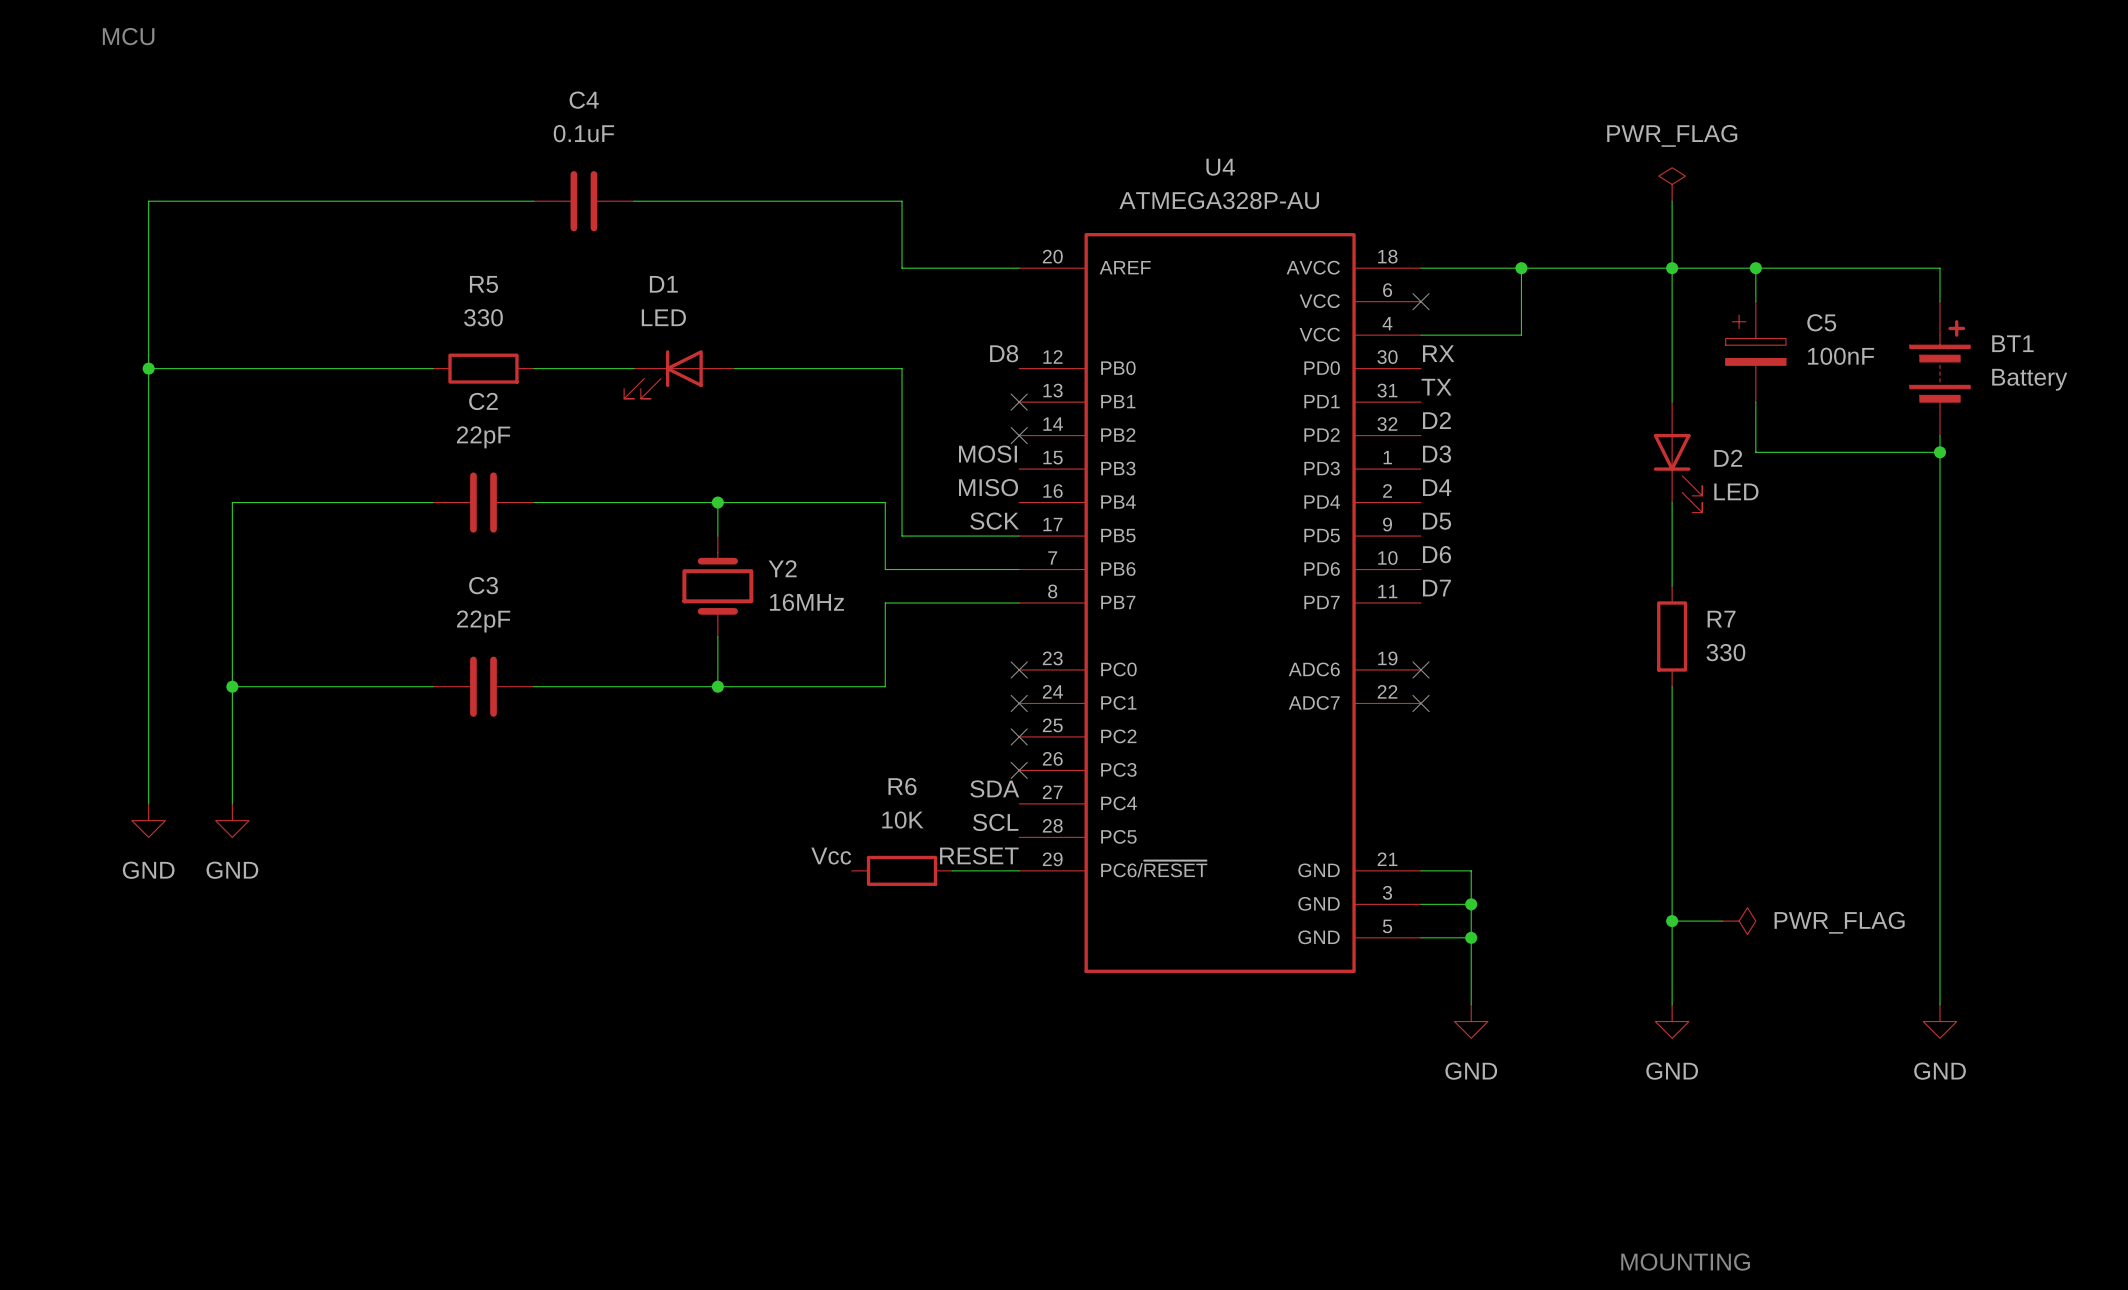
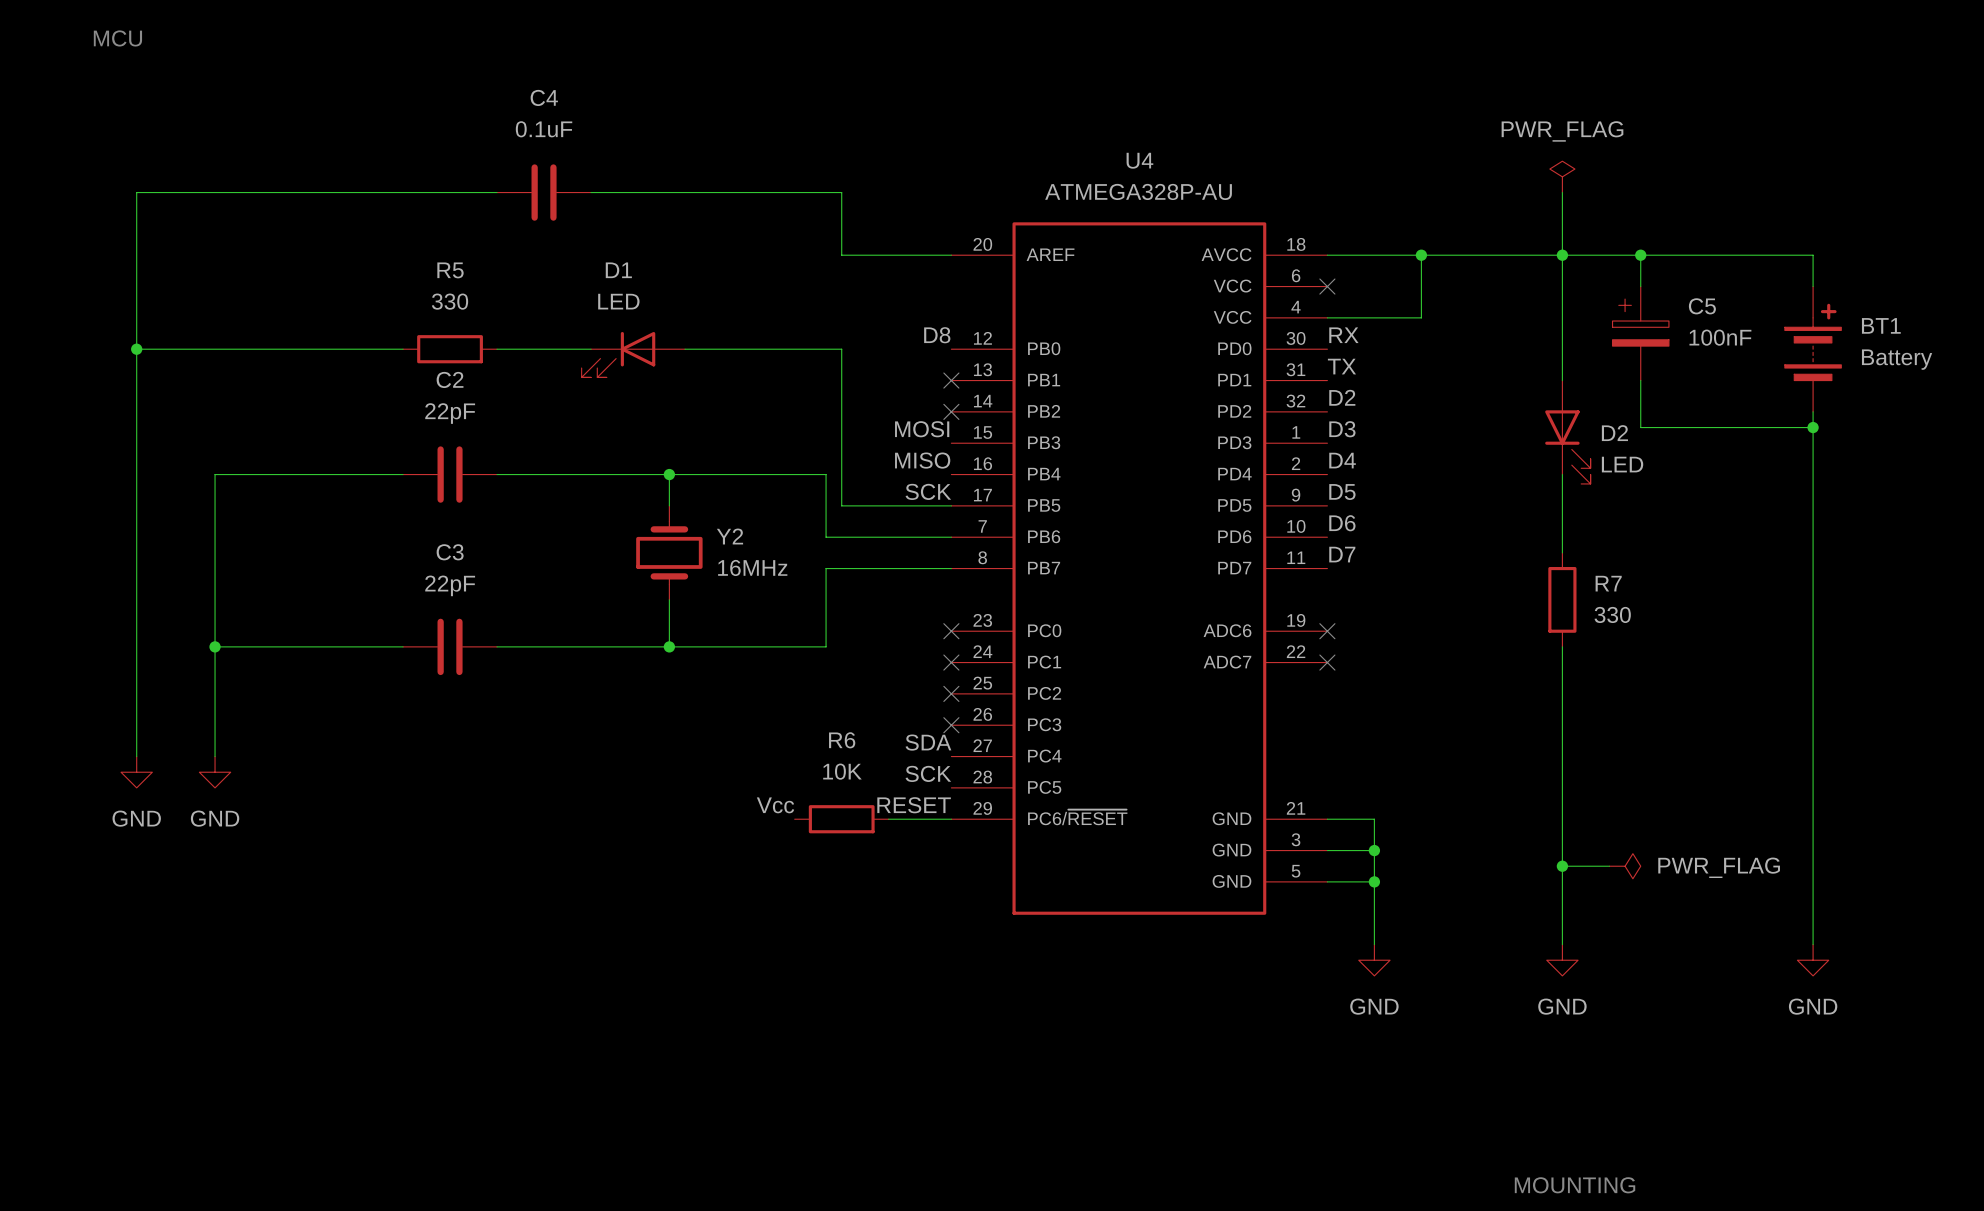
label: SCL (995, 822) -> SCK (928, 773)

